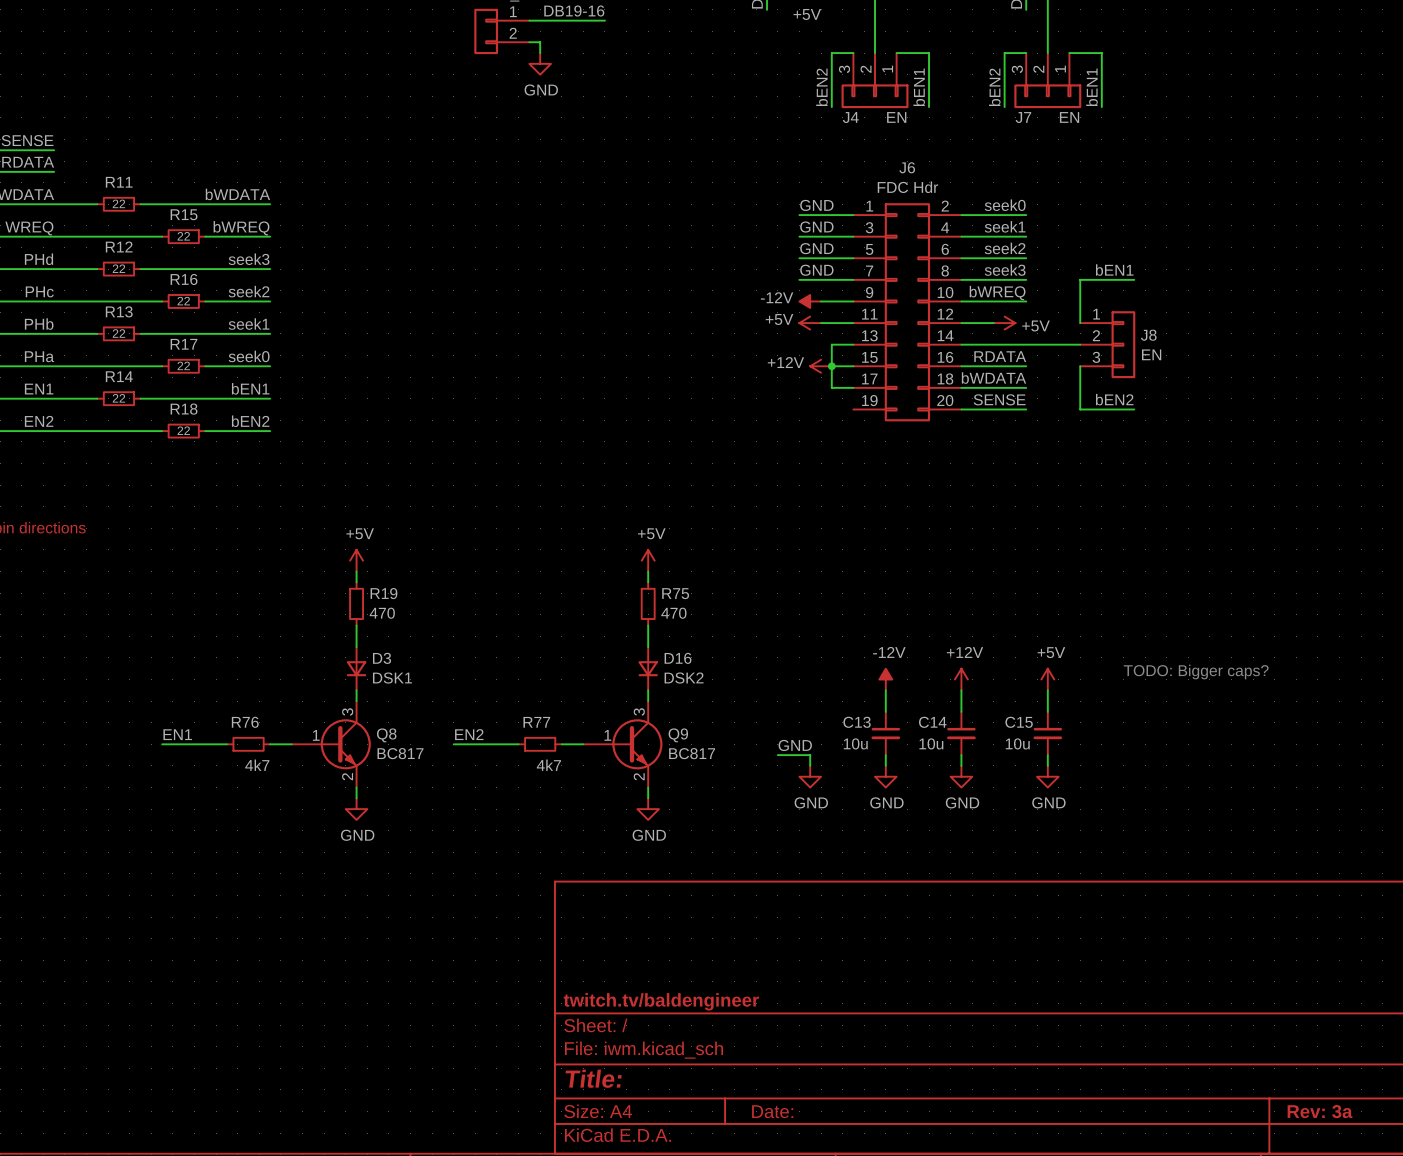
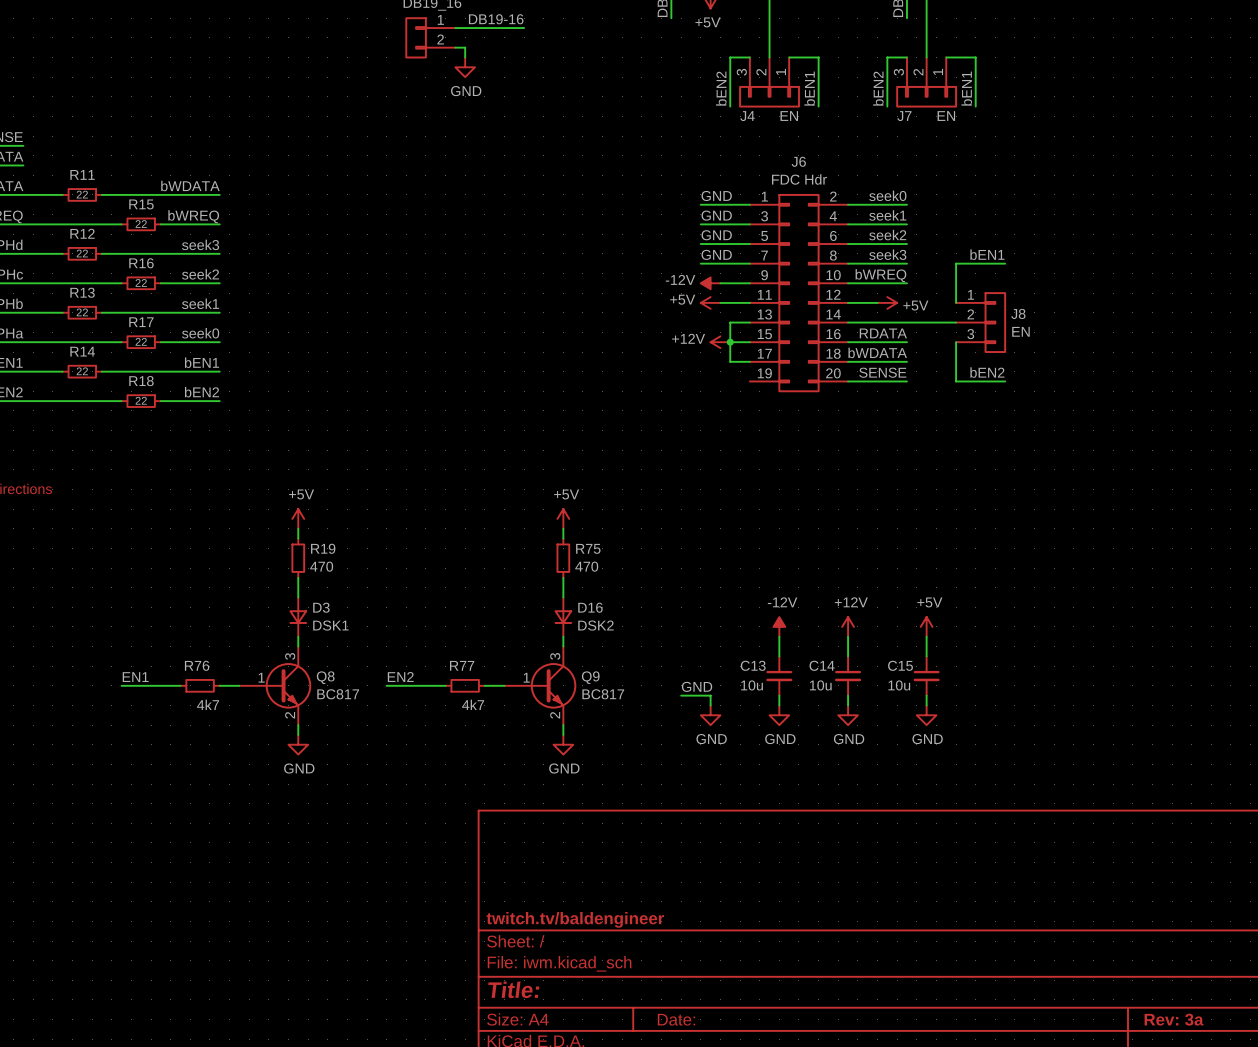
text: TODO: Bigger caps? (1196, 672) -> none

